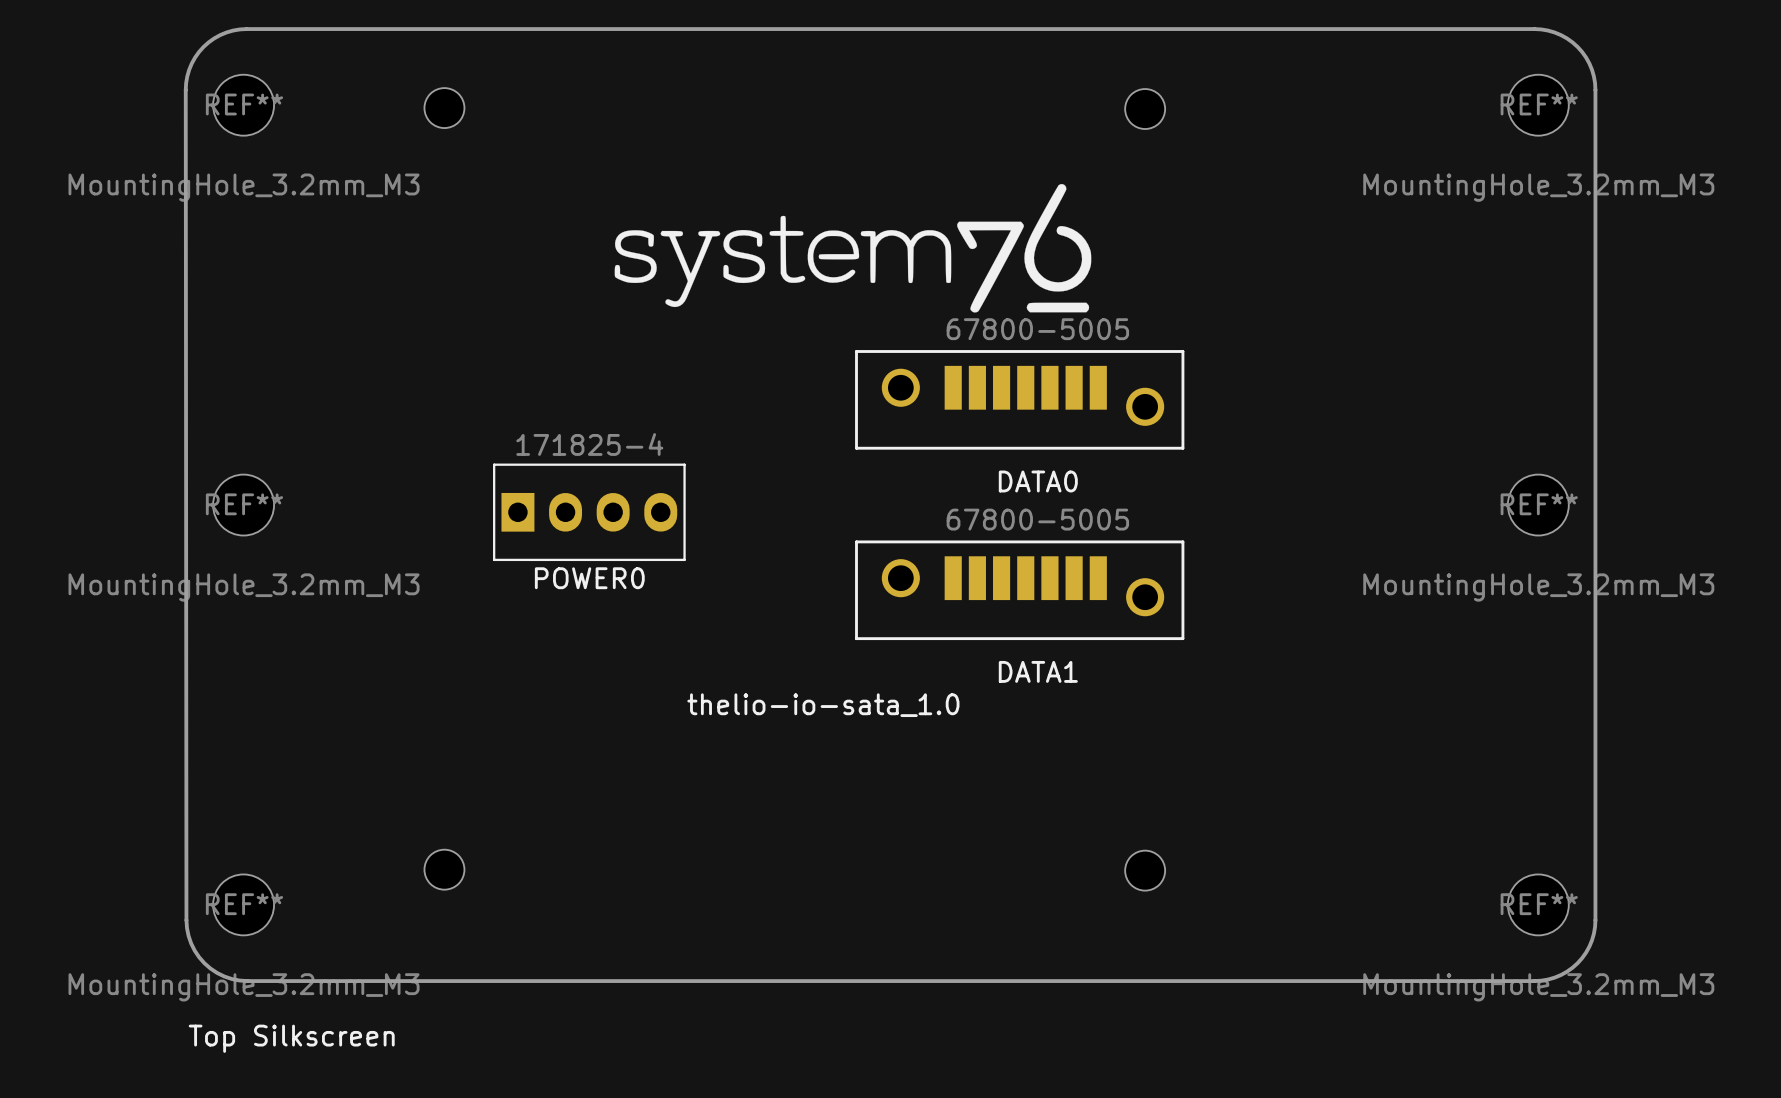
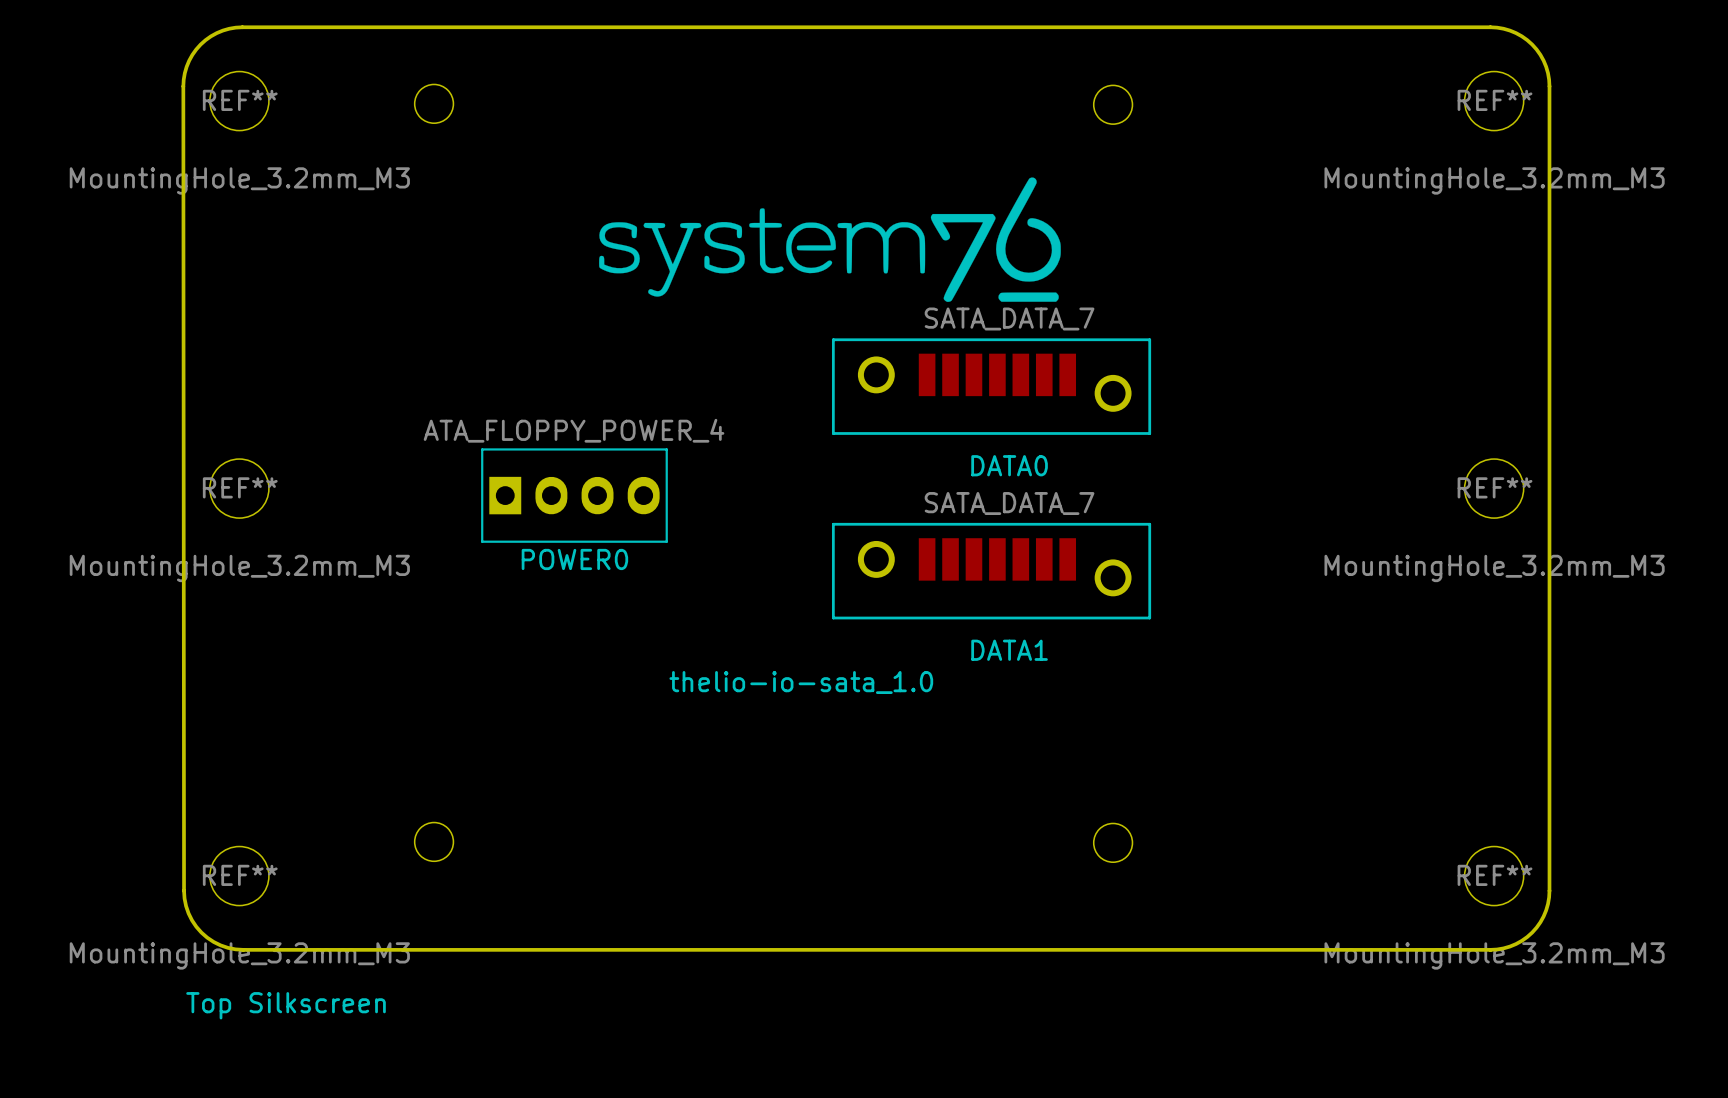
DATA0 value: 67800-5005 (1037, 329) -> SATA_DATA_7 (1009, 318)
POWER0 value: 171825-4 (589, 444) -> ATA_FLOPPY_POWER_4 (574, 430)
DATA1 value: 67800-5005 (1037, 519) -> SATA_DATA_7 (1009, 503)

